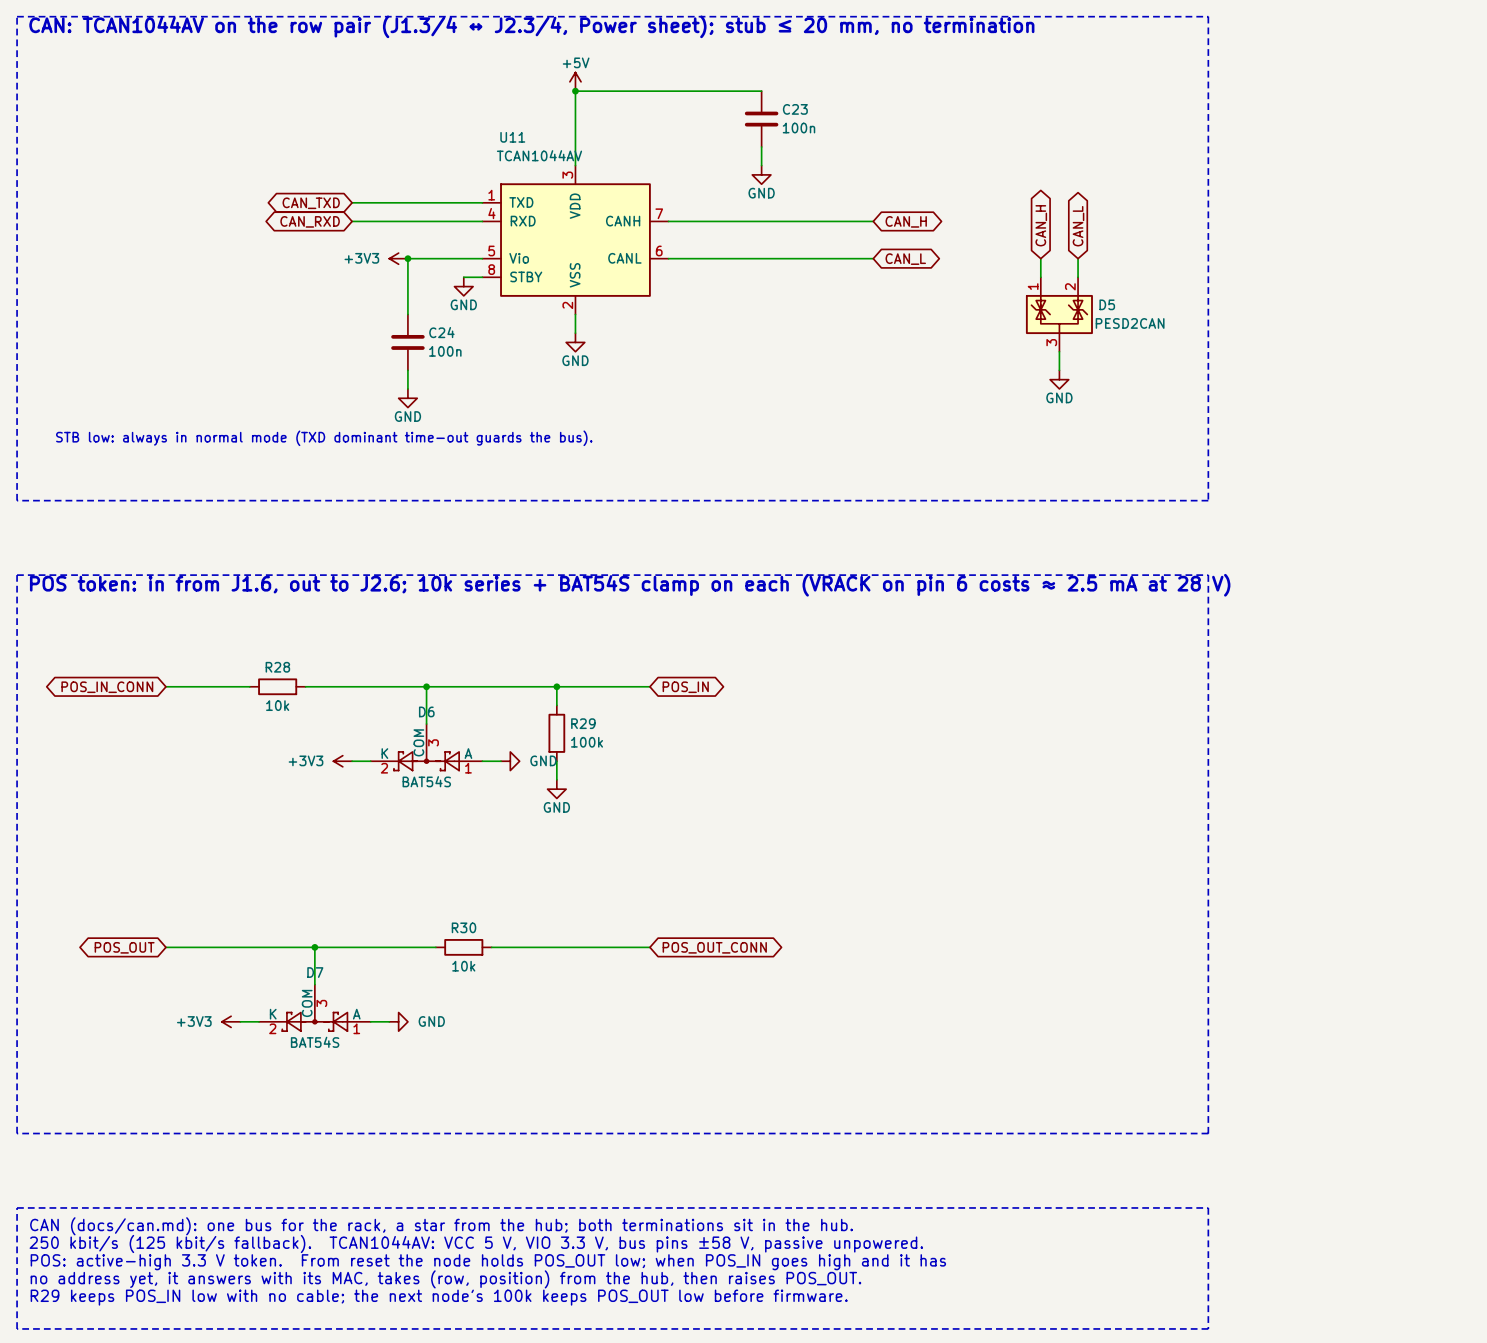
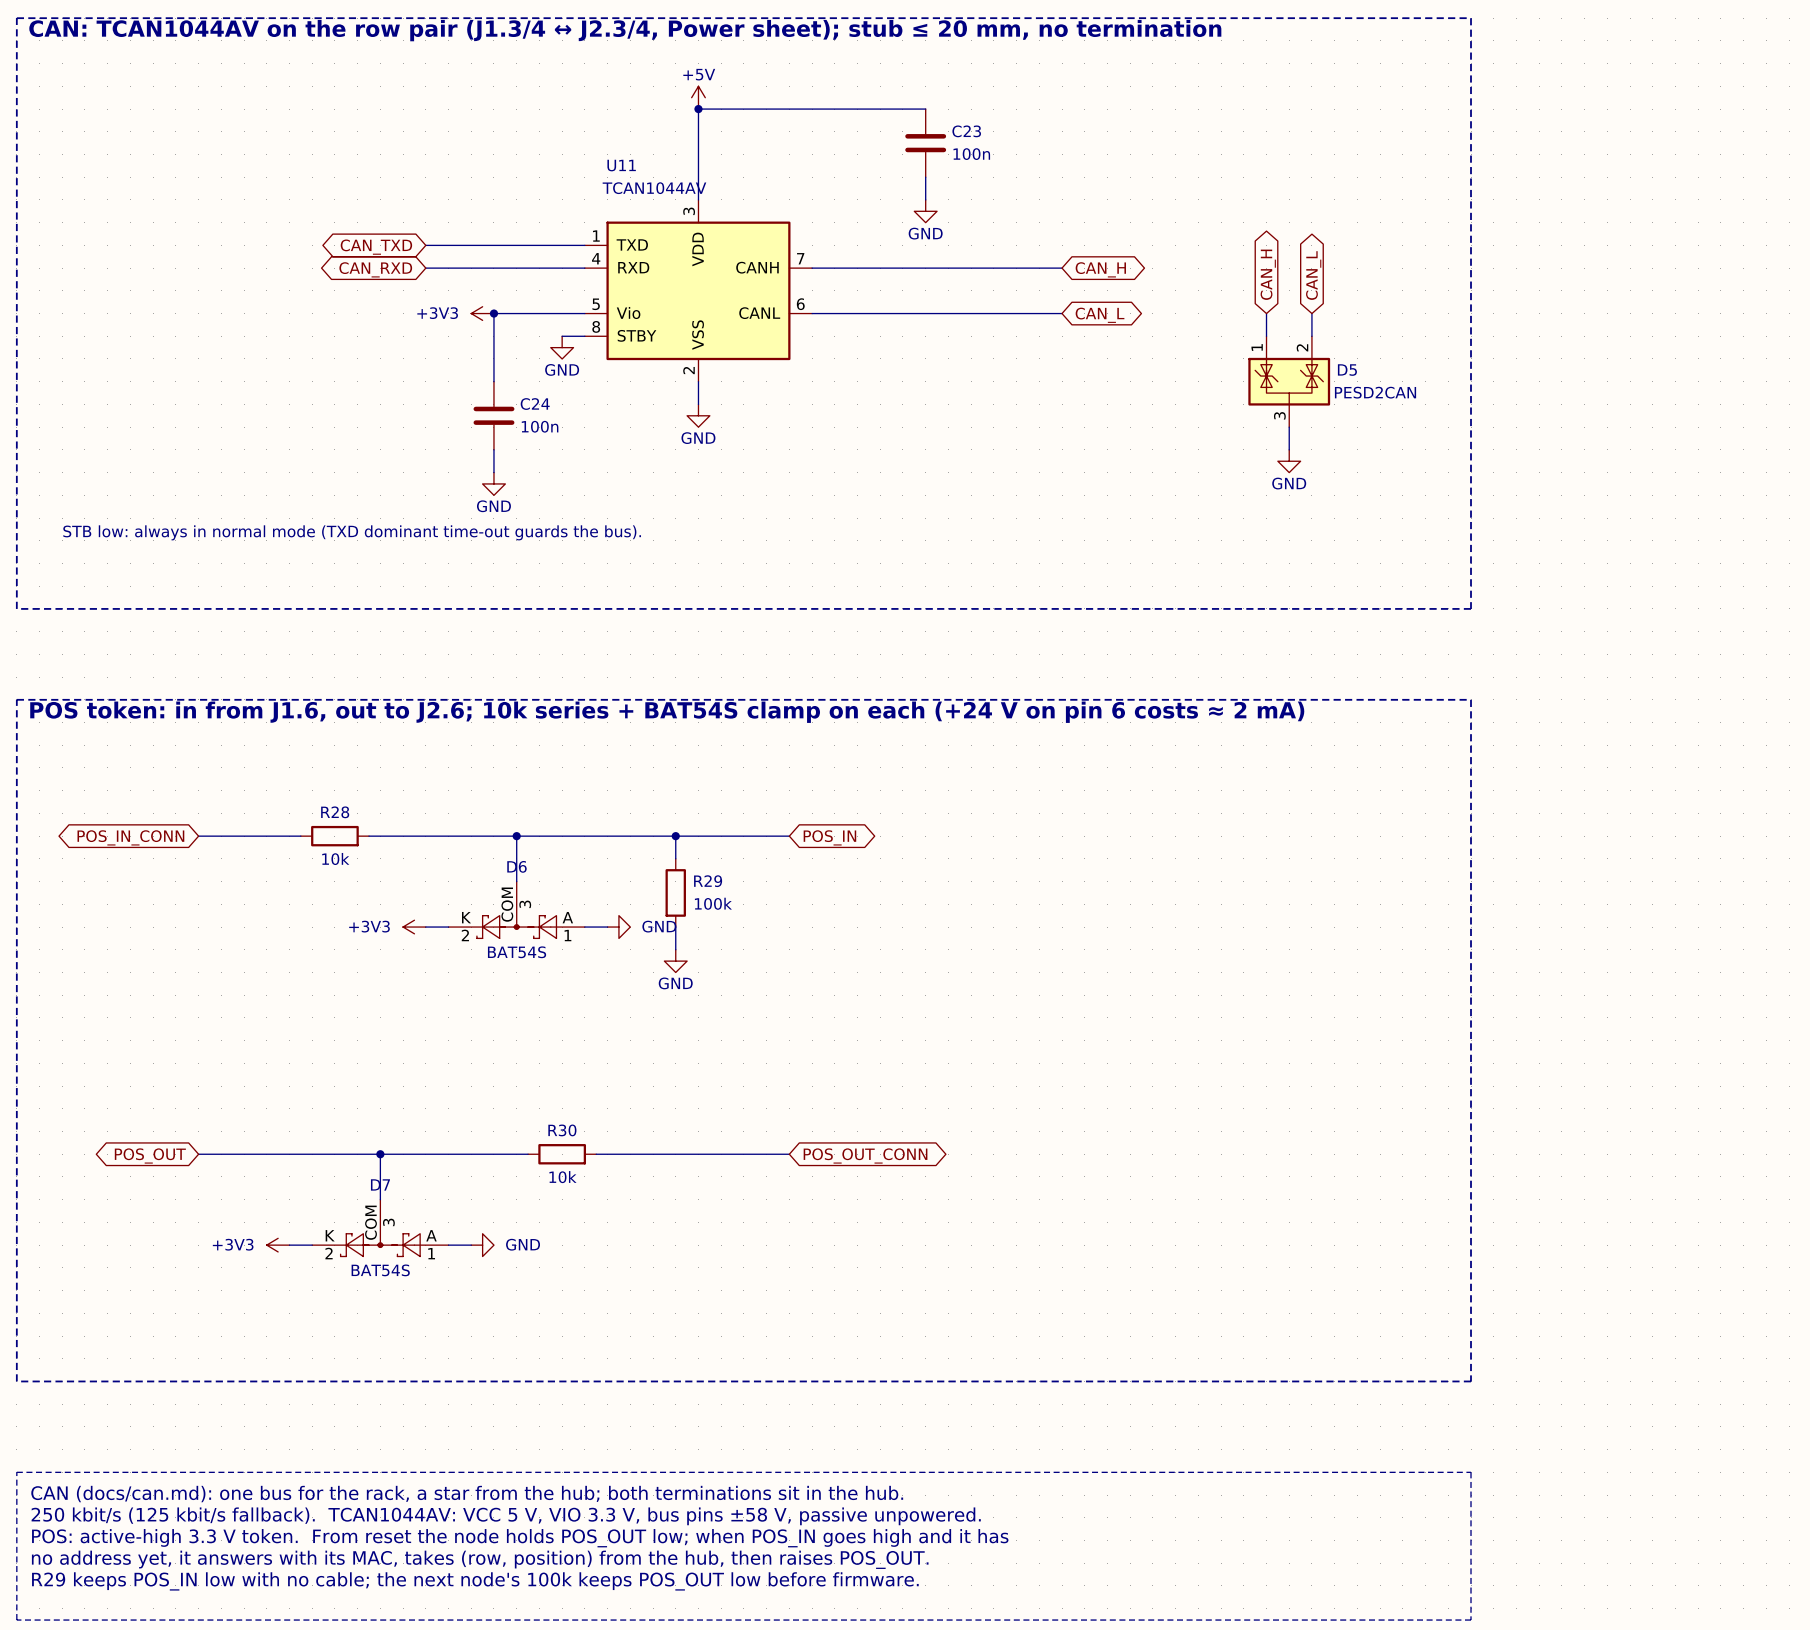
text: POS token: in from J1.6, out to J2.6; 10k series + BAT54S clamp on each (VRACK on pin 6 costs ≈ 2.5 mA at 28 V) (630, 585) -> POS token: in from J1.6, out to J2.6; 10k series + BAT54S clamp on each (+24 V on pin 6 costs ≈ 2 mA) (667, 712)

